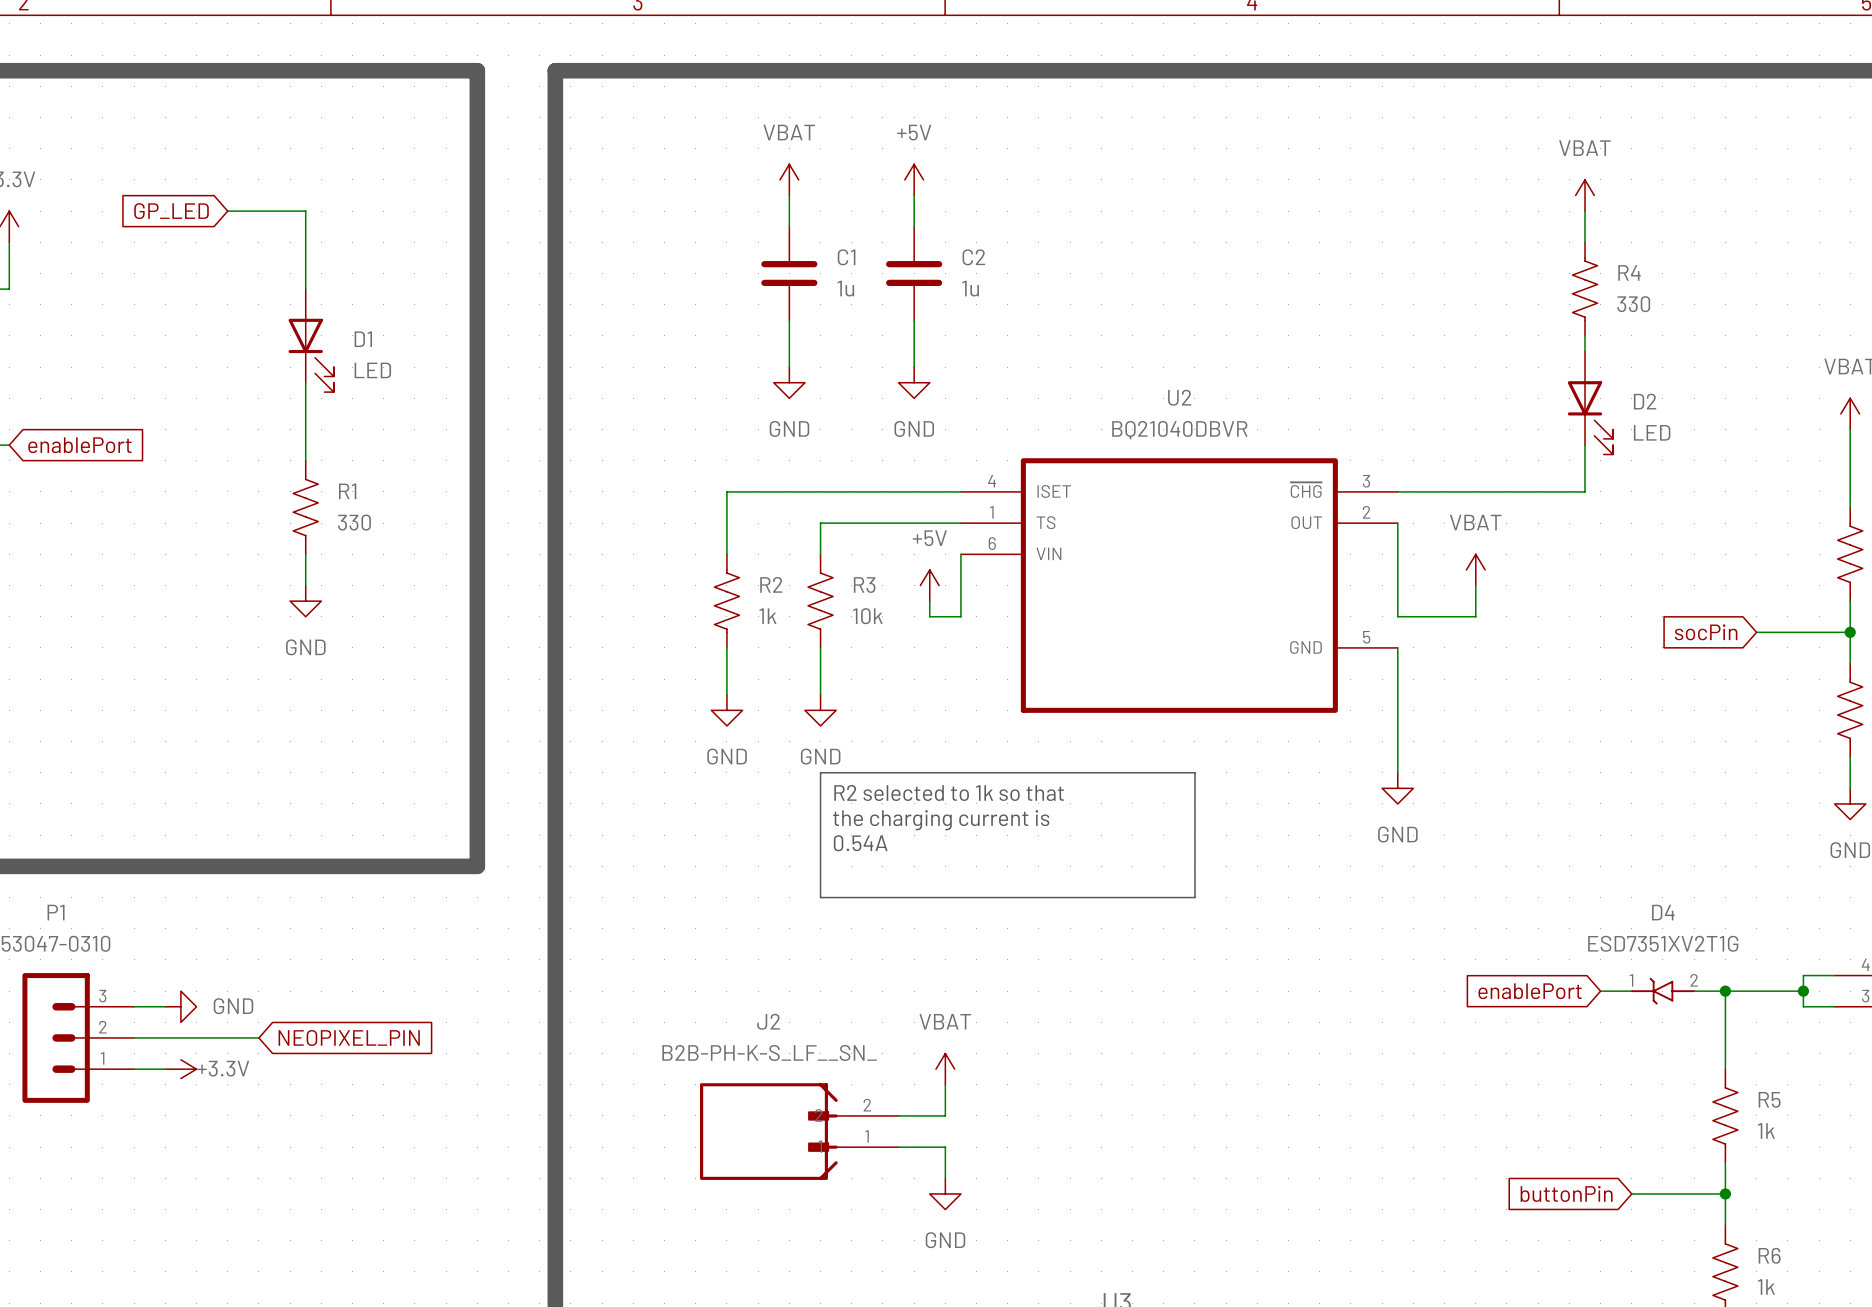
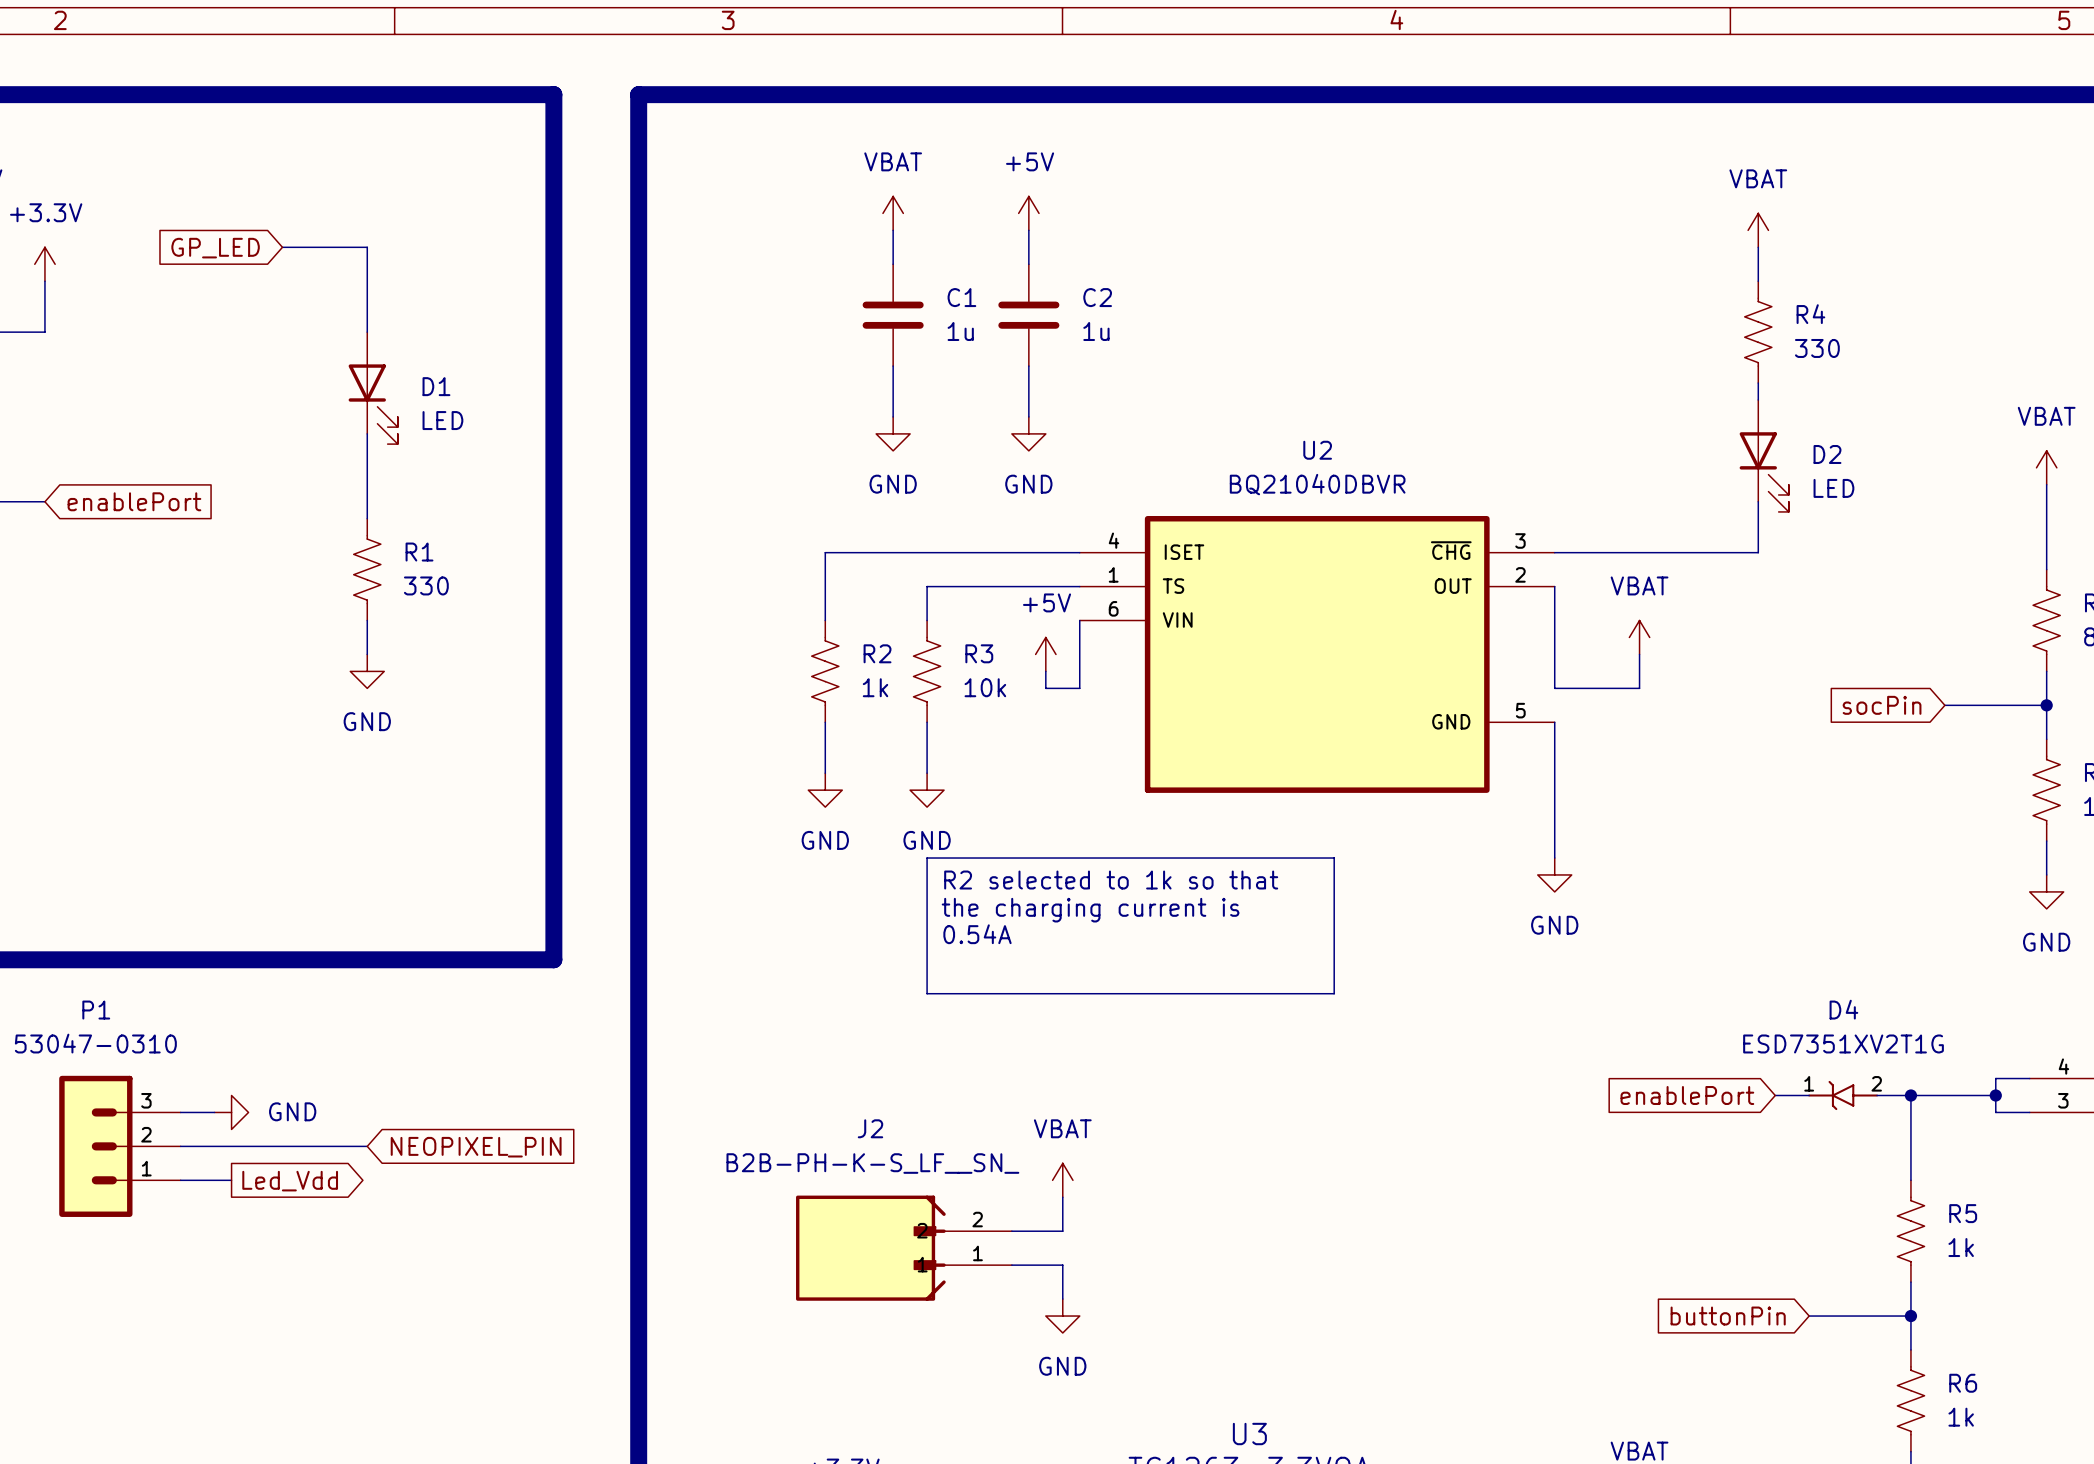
wire: none -> (316, 1146) (367, 1146)
global label position: NEOPIXEL_PIN (349, 1037) -> NEOPIXEL_PIN (476, 1147)
power symbol: +3.3V (180, 1069) -> none
global label: none -> Led_Vdd (290, 1181)

